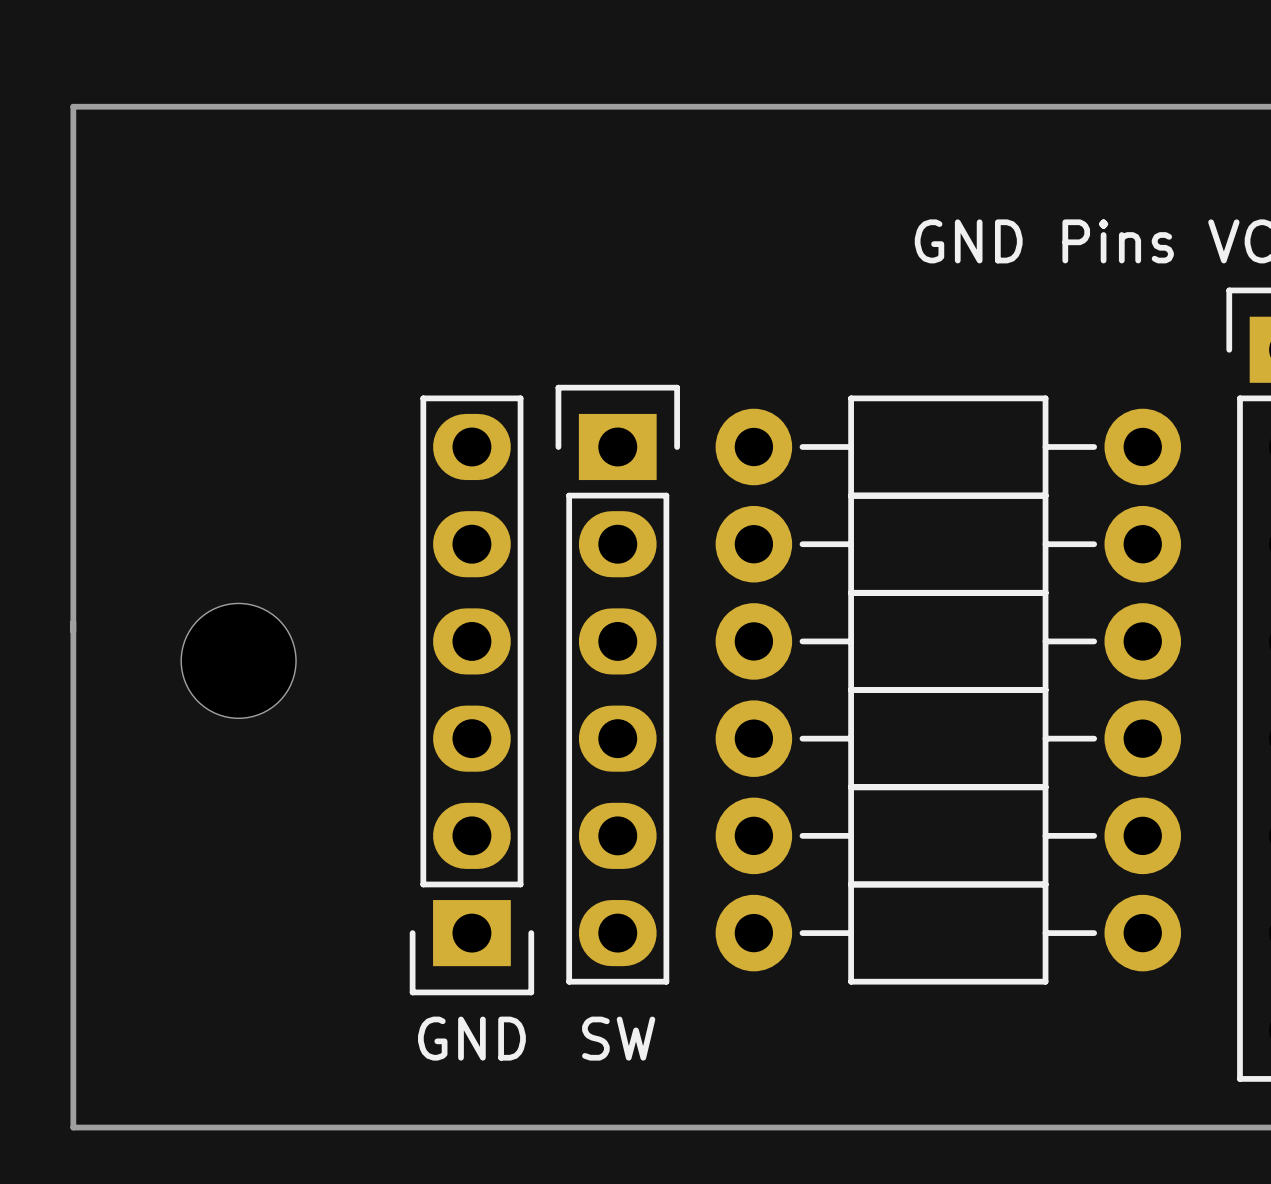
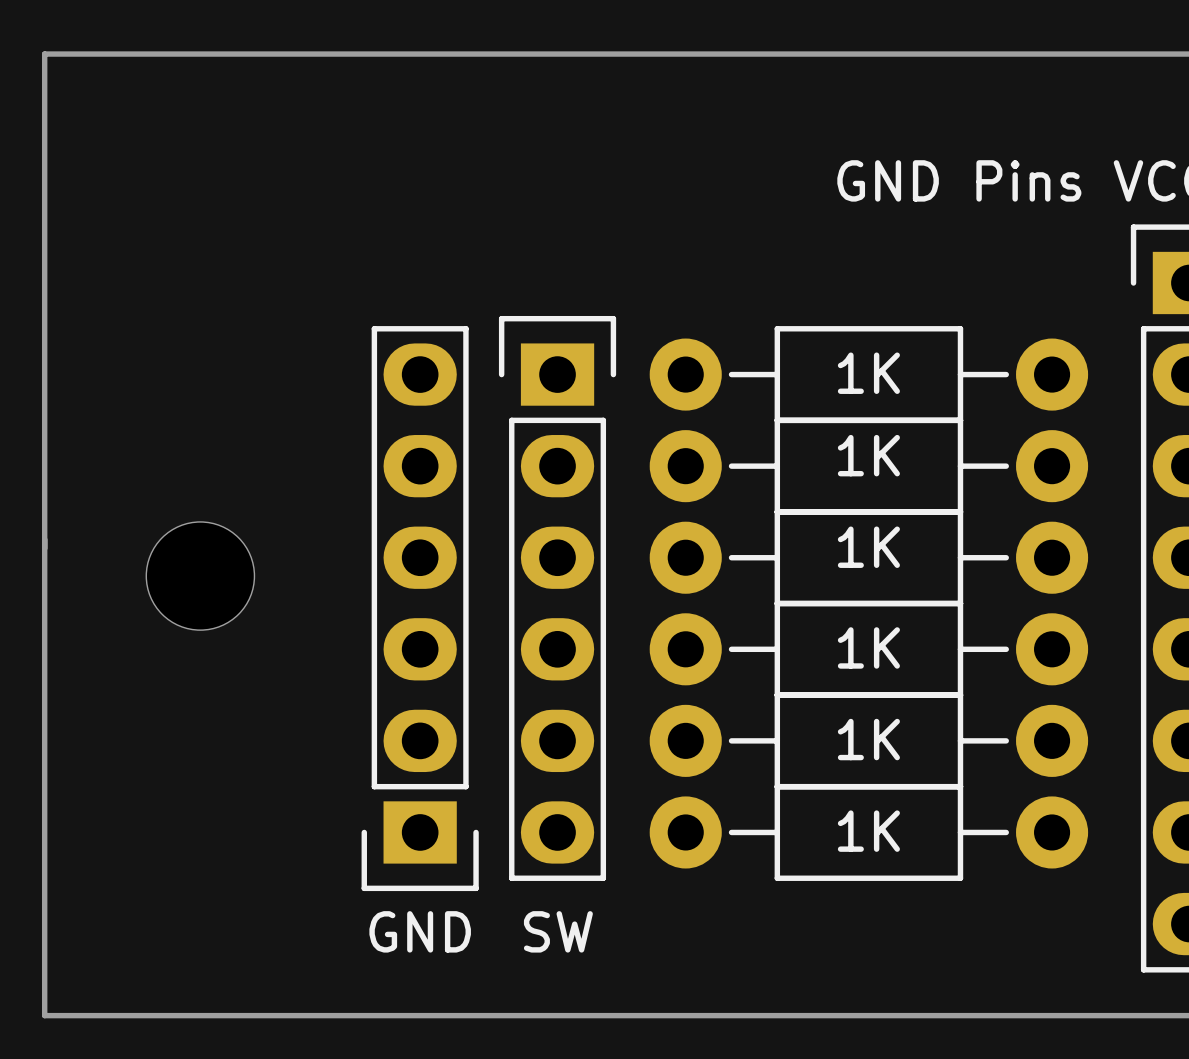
part value: none -> 1K (868, 373)
part value: none -> 1K (868, 455)
part value: none -> 1K (868, 547)
part value: none -> 1K (868, 647)
part value: none -> 1K (868, 739)
part value: none -> 1K (868, 831)

